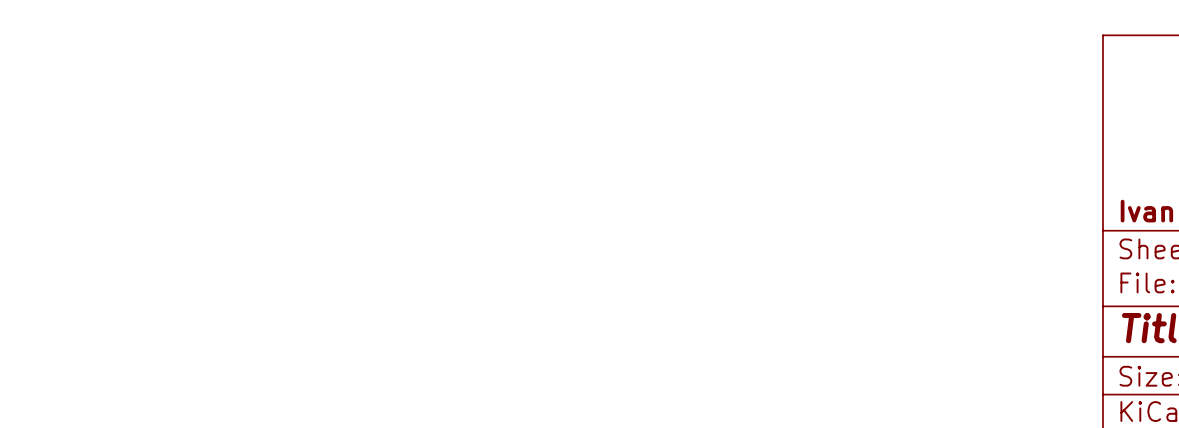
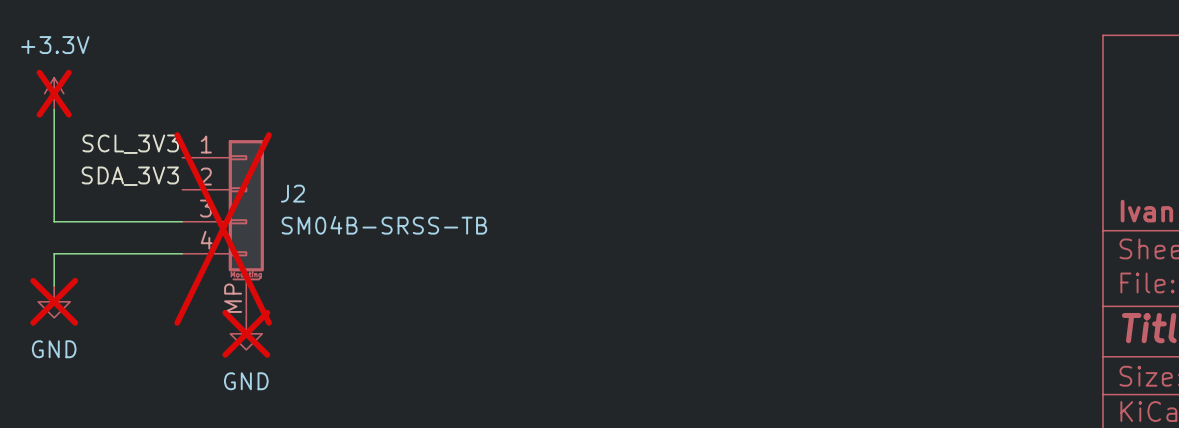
power symbol: none -> +3.3V (54, 93)
wire: none -> (54, 109) (54, 221) (182, 221)
label: none -> SCL_3V3 (130, 144)
label: none -> SDA_3V3 (130, 176)
J2: none -> SM04B-SRSS-TB (223, 228)
wire: none -> (182, 253) (54, 253) (54, 285)
power symbol: none -> GND (54, 301)
power symbol: none -> GND (246, 333)

